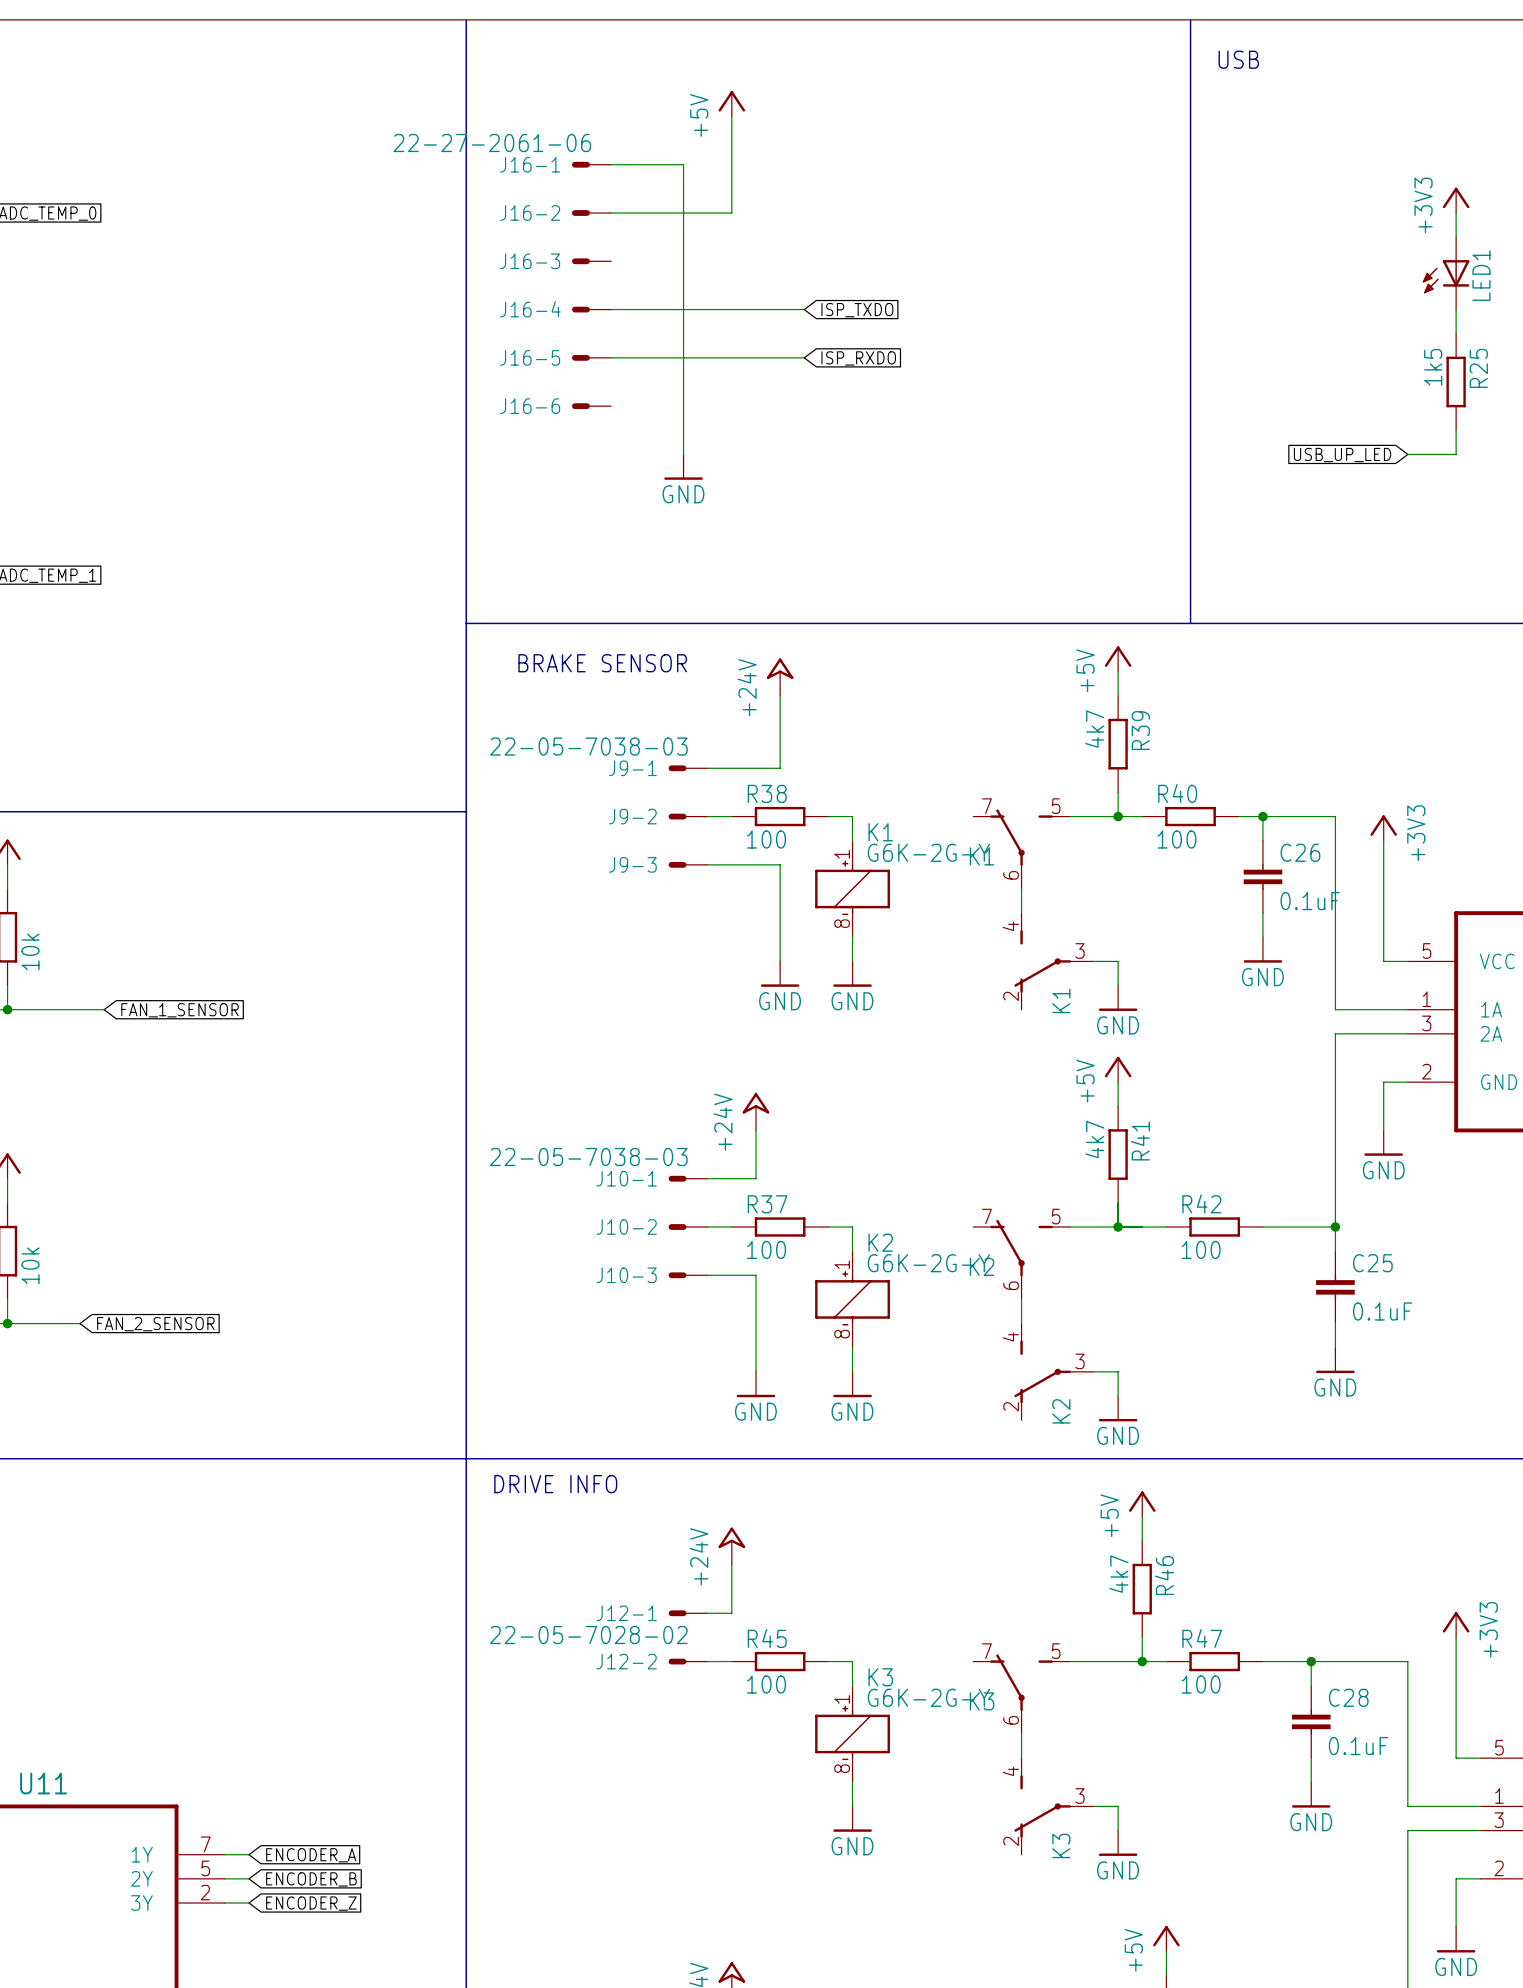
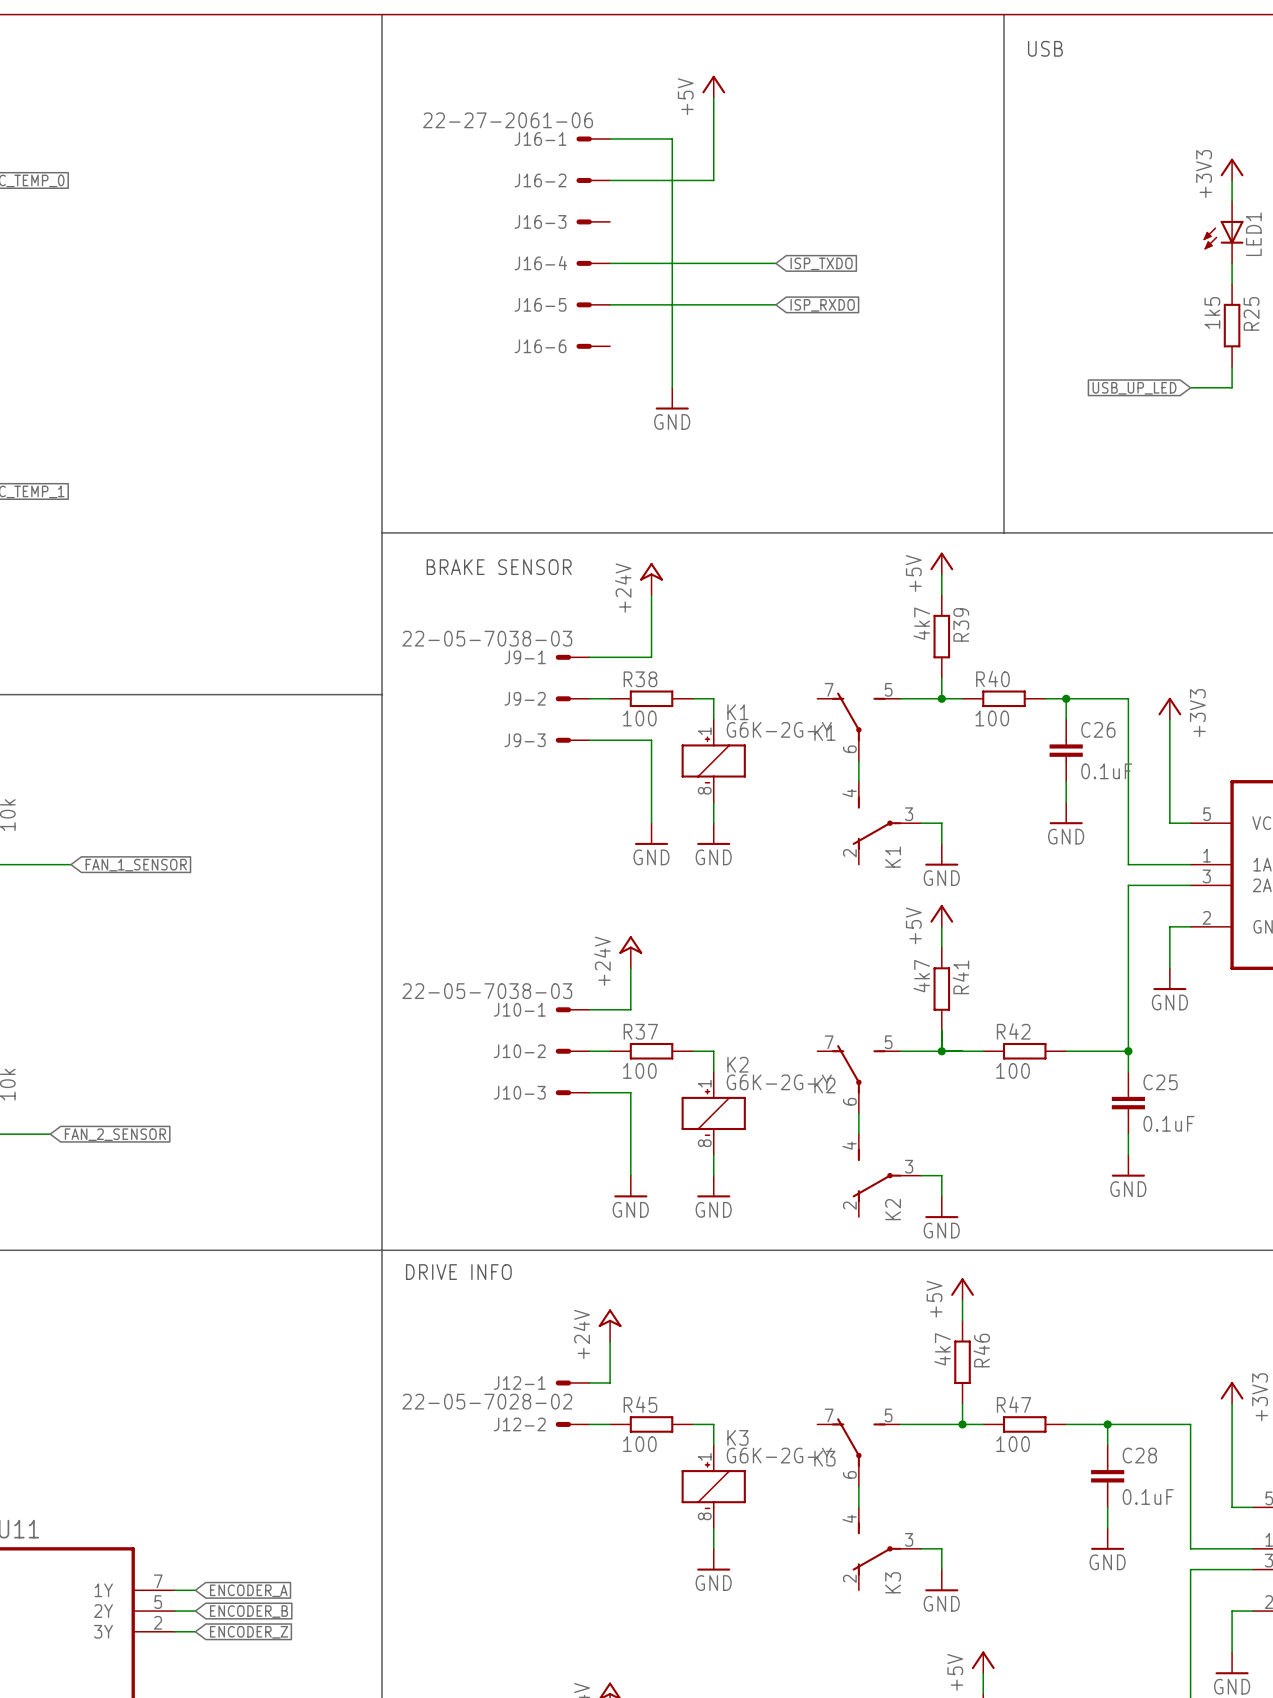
power symbol position: +5V (731, 103) -> +5V (713, 86)
wire: (731, 116) (731, 213) (611, 213) -> (713, 97) (713, 180) (610, 180)
J16-1 position: (591, 164) -> (593, 138)
wire: (611, 164) (683, 164) (683, 454) -> (610, 138) (672, 138) (672, 387)
J16-2 position: (591, 213) -> (593, 180)
J16-3 position: (591, 261) -> (593, 221)
J16-4 position: (591, 309) -> (593, 263)
wire: (611, 309) (731, 309) -> (672, 263) (775, 263)
global label position: ISP_TXDO (857, 310) -> ISP_TXDO (821, 263)
J16-5 position: (591, 357) -> (593, 304)
wire: (611, 357) (731, 357) -> (672, 304) (775, 304)
global label position: ISP_RXDO (858, 358) -> ISP_RXDO (822, 305)
J16-6 position: (591, 406) -> (593, 346)
power symbol position: GND (683, 467) -> GND (672, 398)

